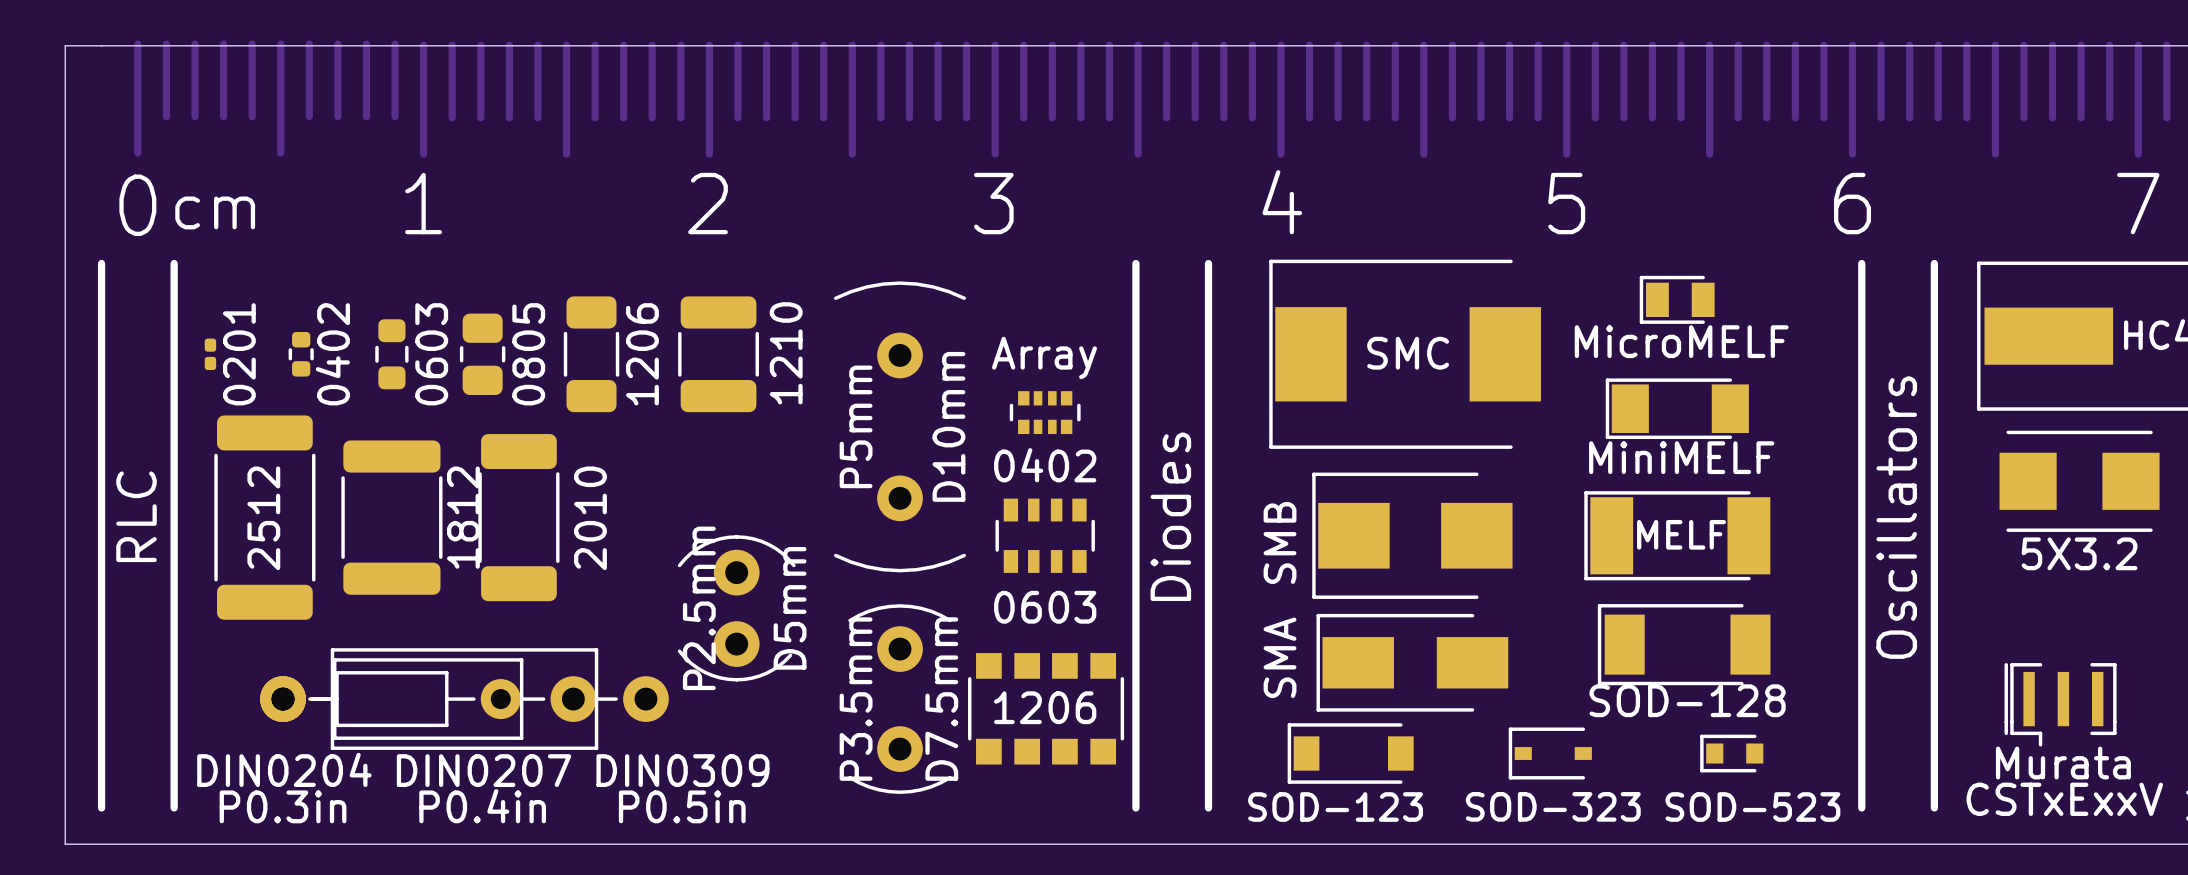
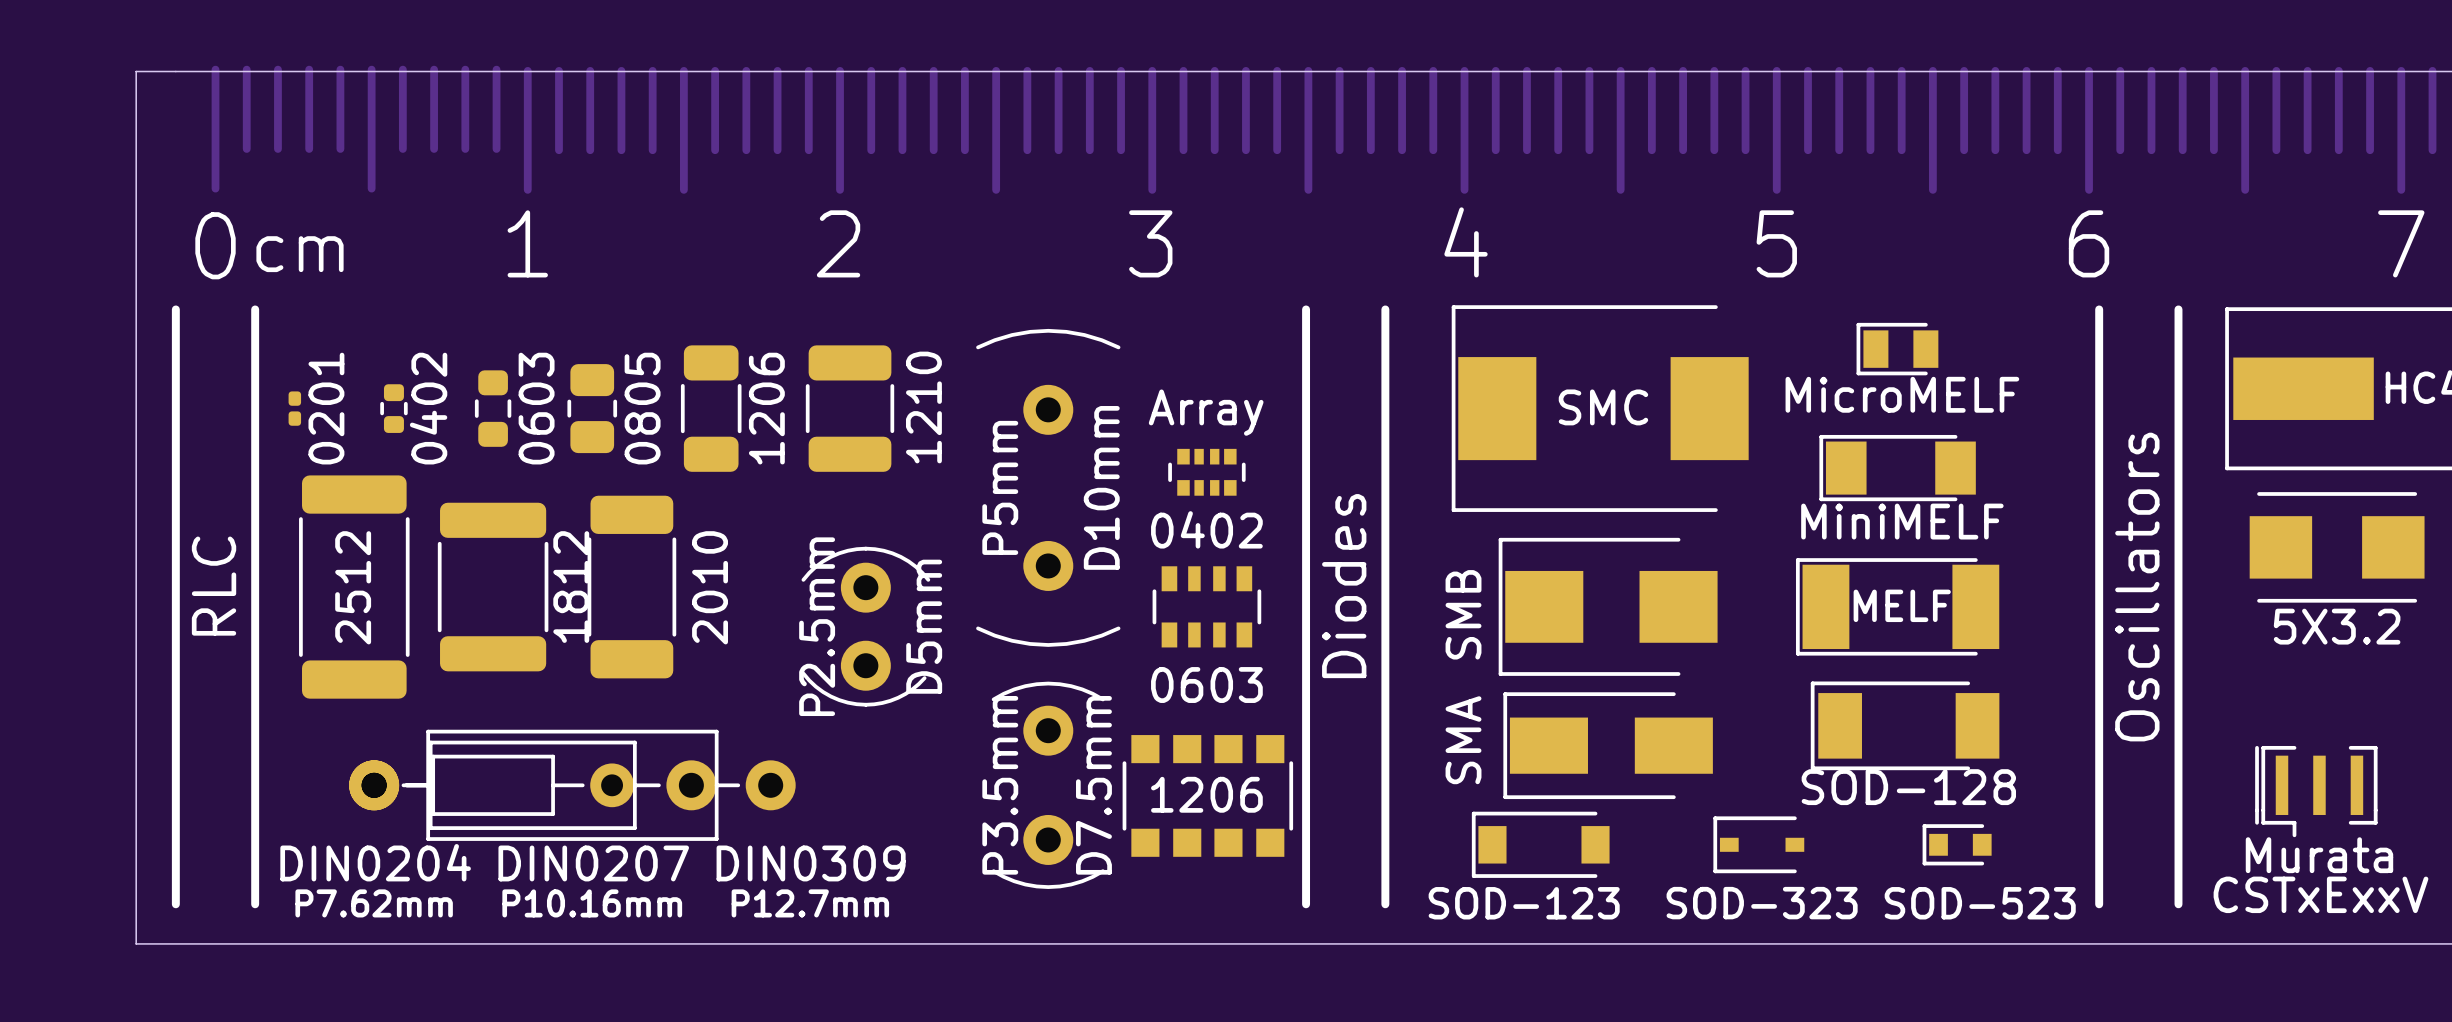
part: none -> (865, 626)
part: (736, 608) -> none
part value: P0.3in (283, 806) -> P7.62mm (374, 903)
part value: P0.4in (482, 806) -> P10.16mm (592, 903)
part value: P0.5in (682, 806) -> P12.7mm (810, 903)

